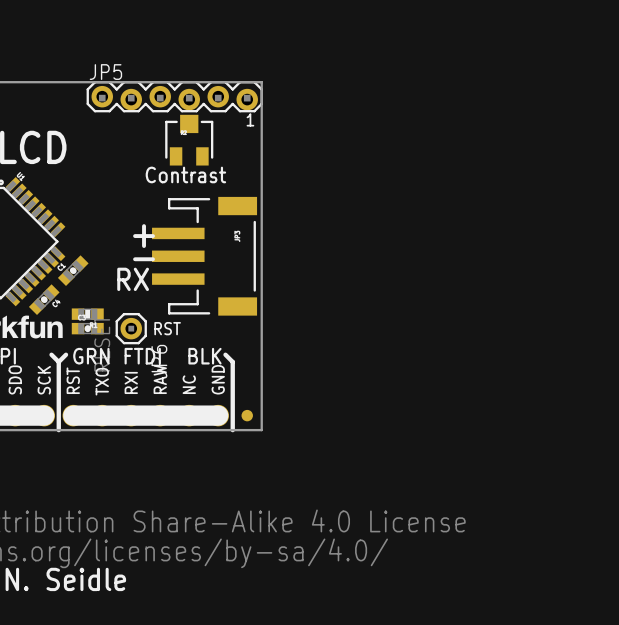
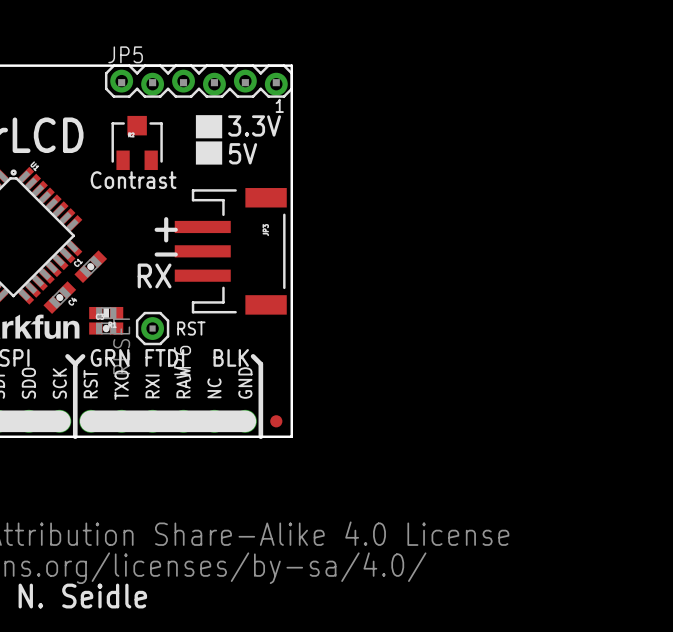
drawing: none -> [195, 115, 223, 165]
text: none -> 3.3V (254, 125)
part position: (189, 140) -> (137, 142)
text: none -> 5V (243, 153)
text position: Contrast (185, 174) -> Contrast (133, 180)

